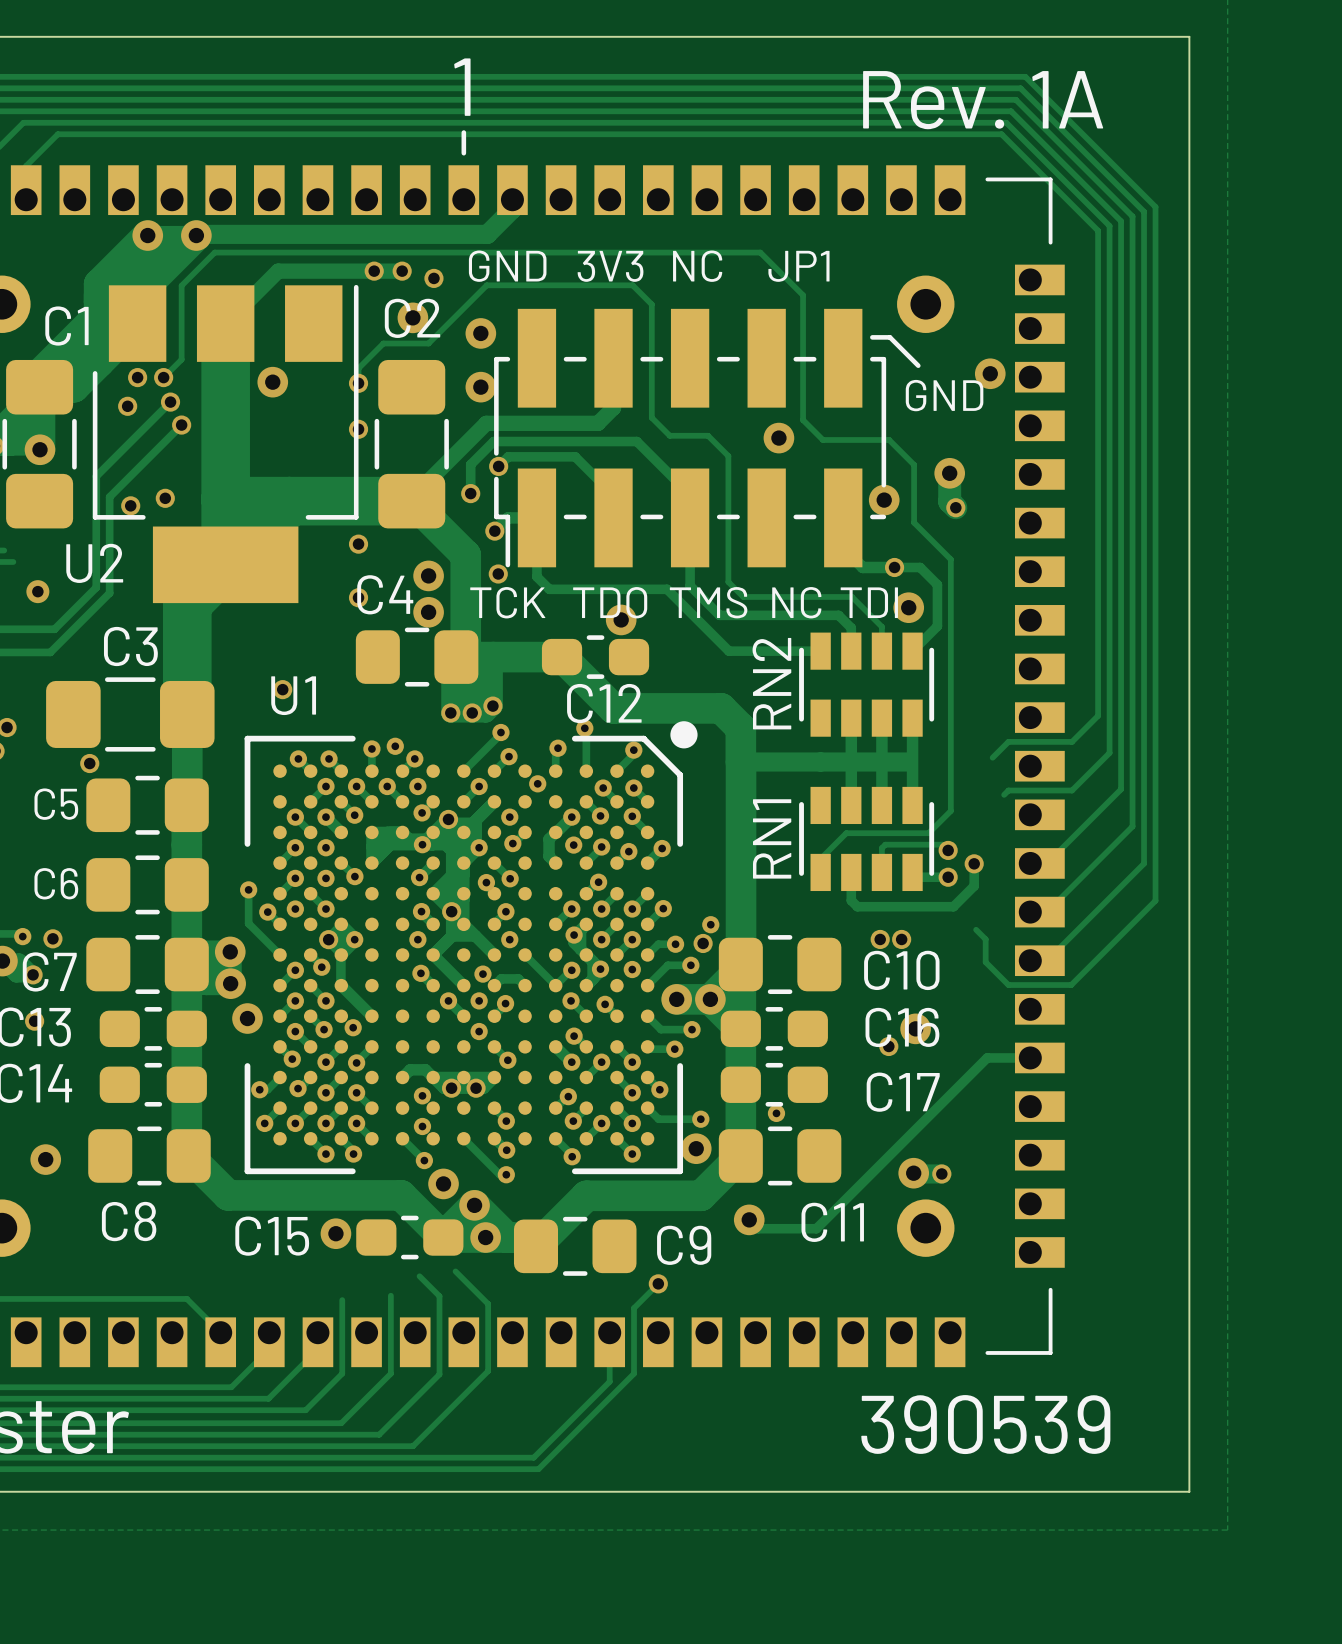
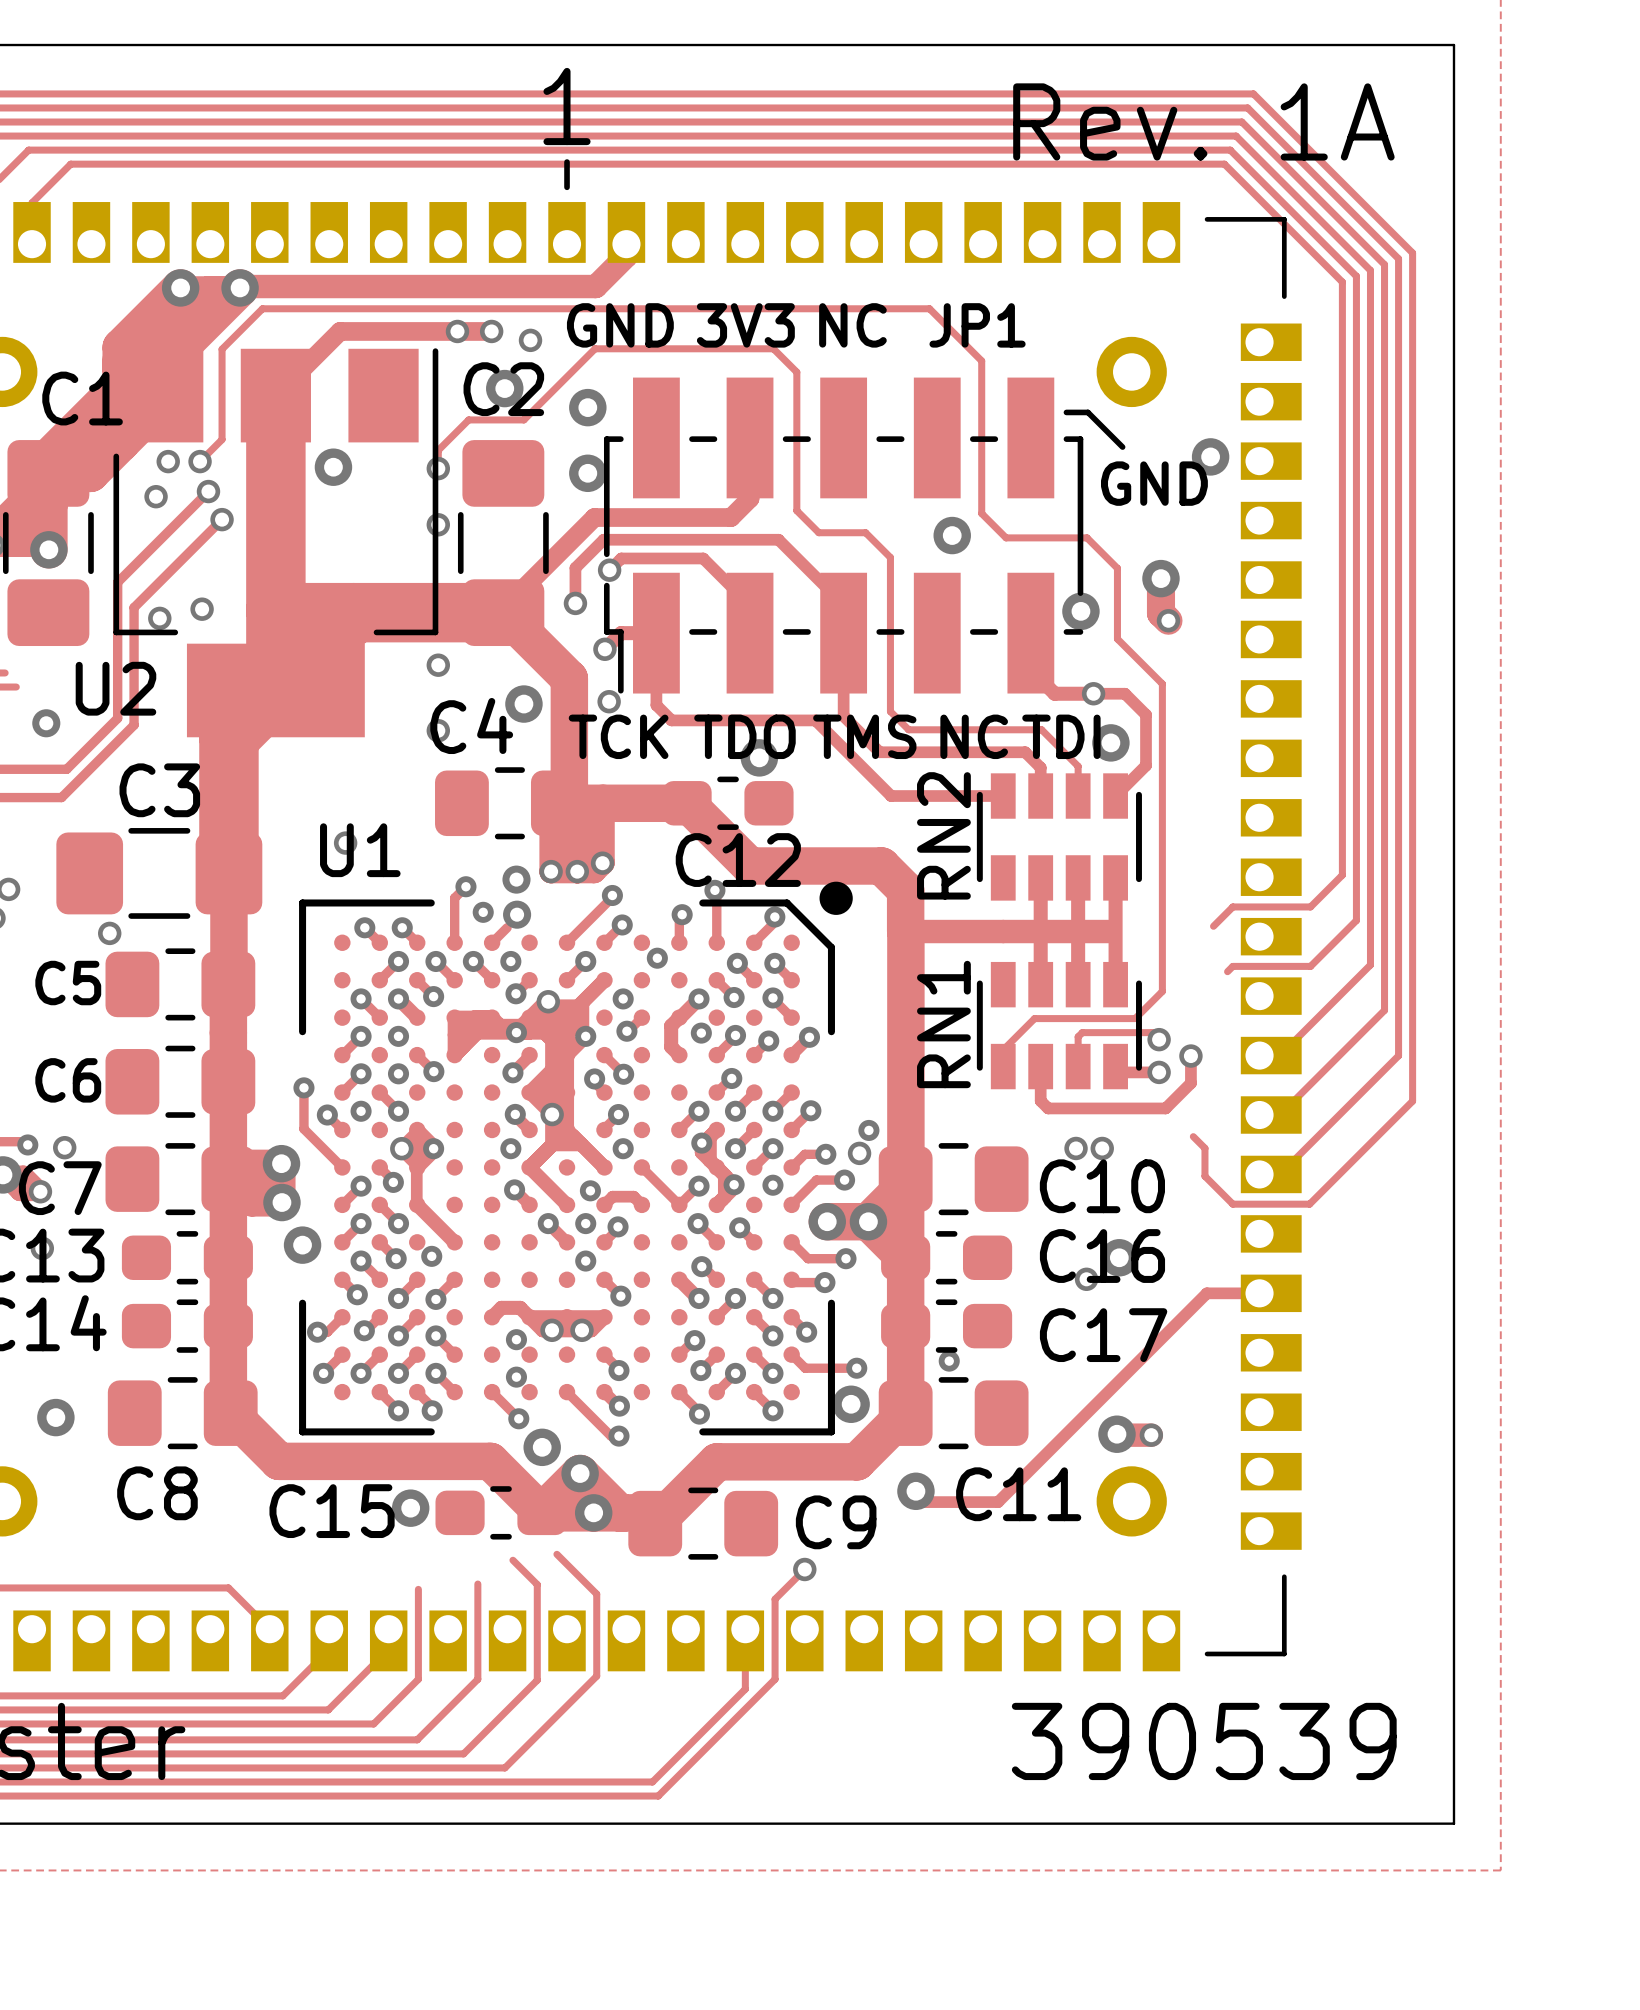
via: (428, 612) -> none
via: none -> (516, 879)
track: none -> (465, 886) (454, 898) (454, 915)
via: none -> (465, 886)
via: (371, 748) -> none
via position: (414, 758) -> (517, 914)

